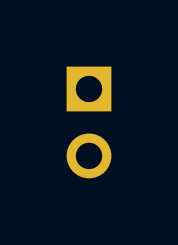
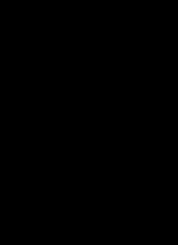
part: (88, 122) -> none

